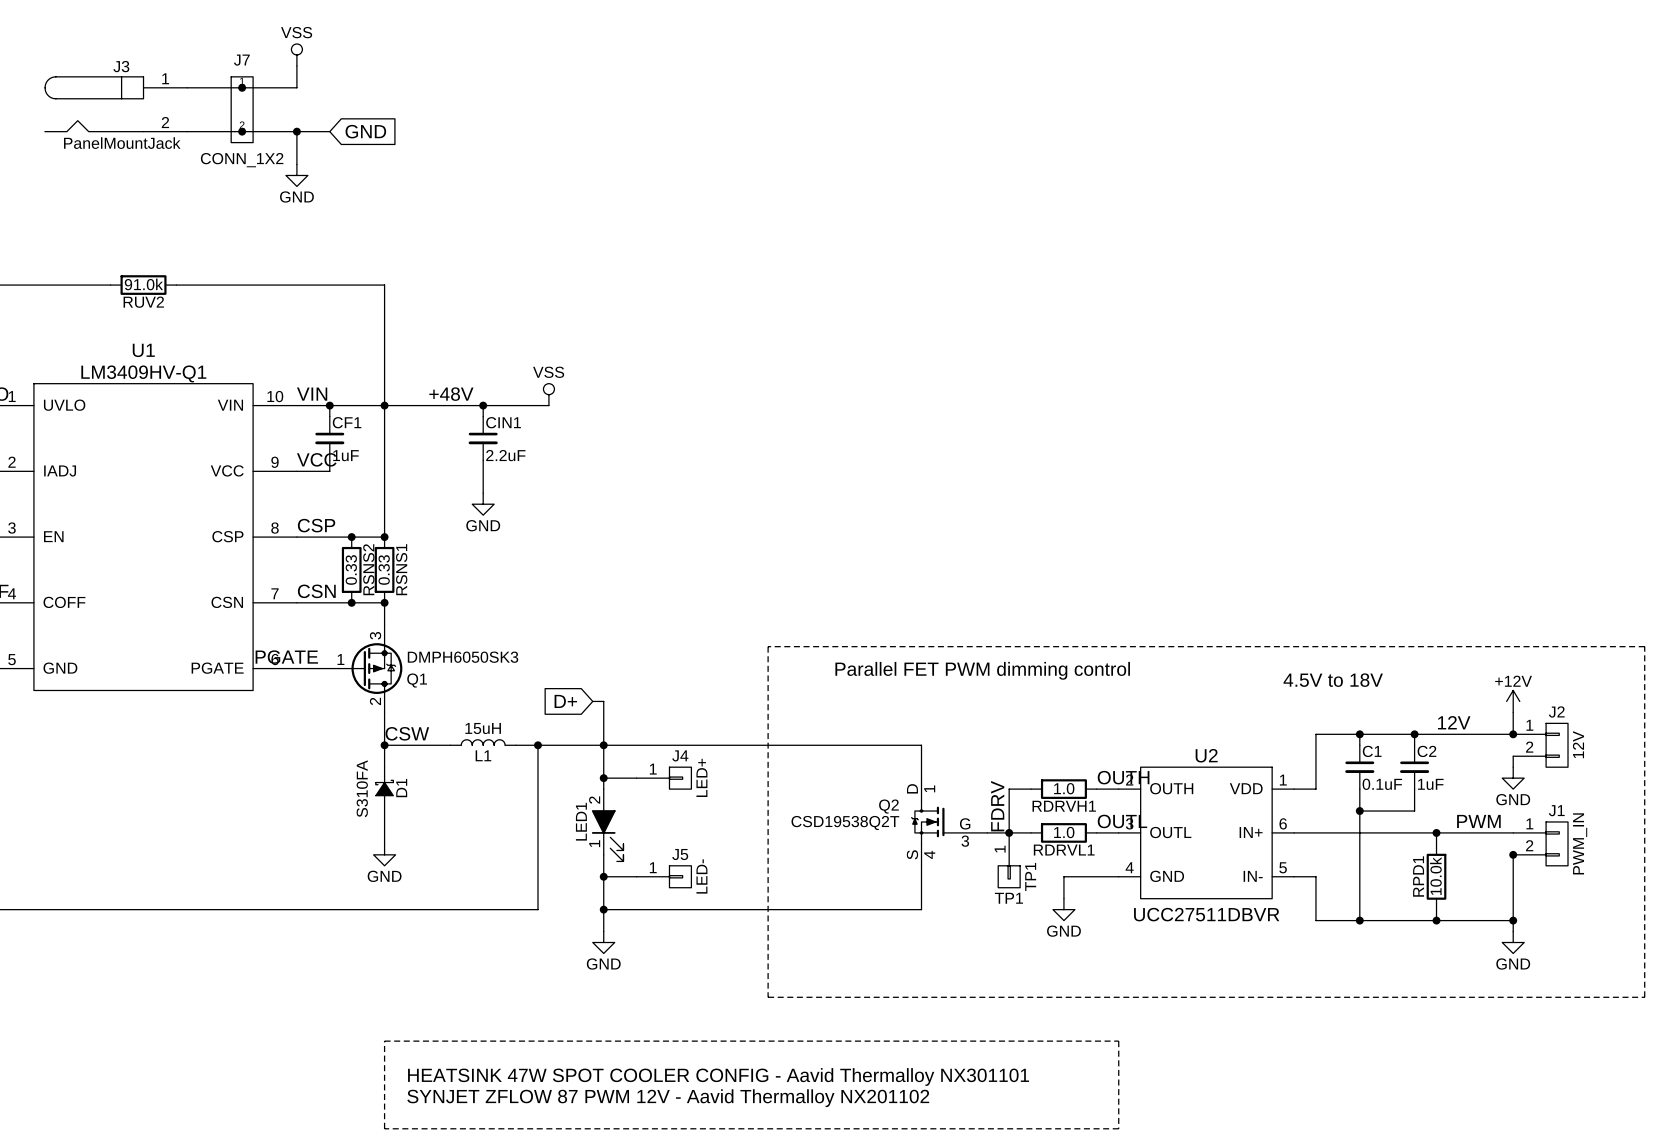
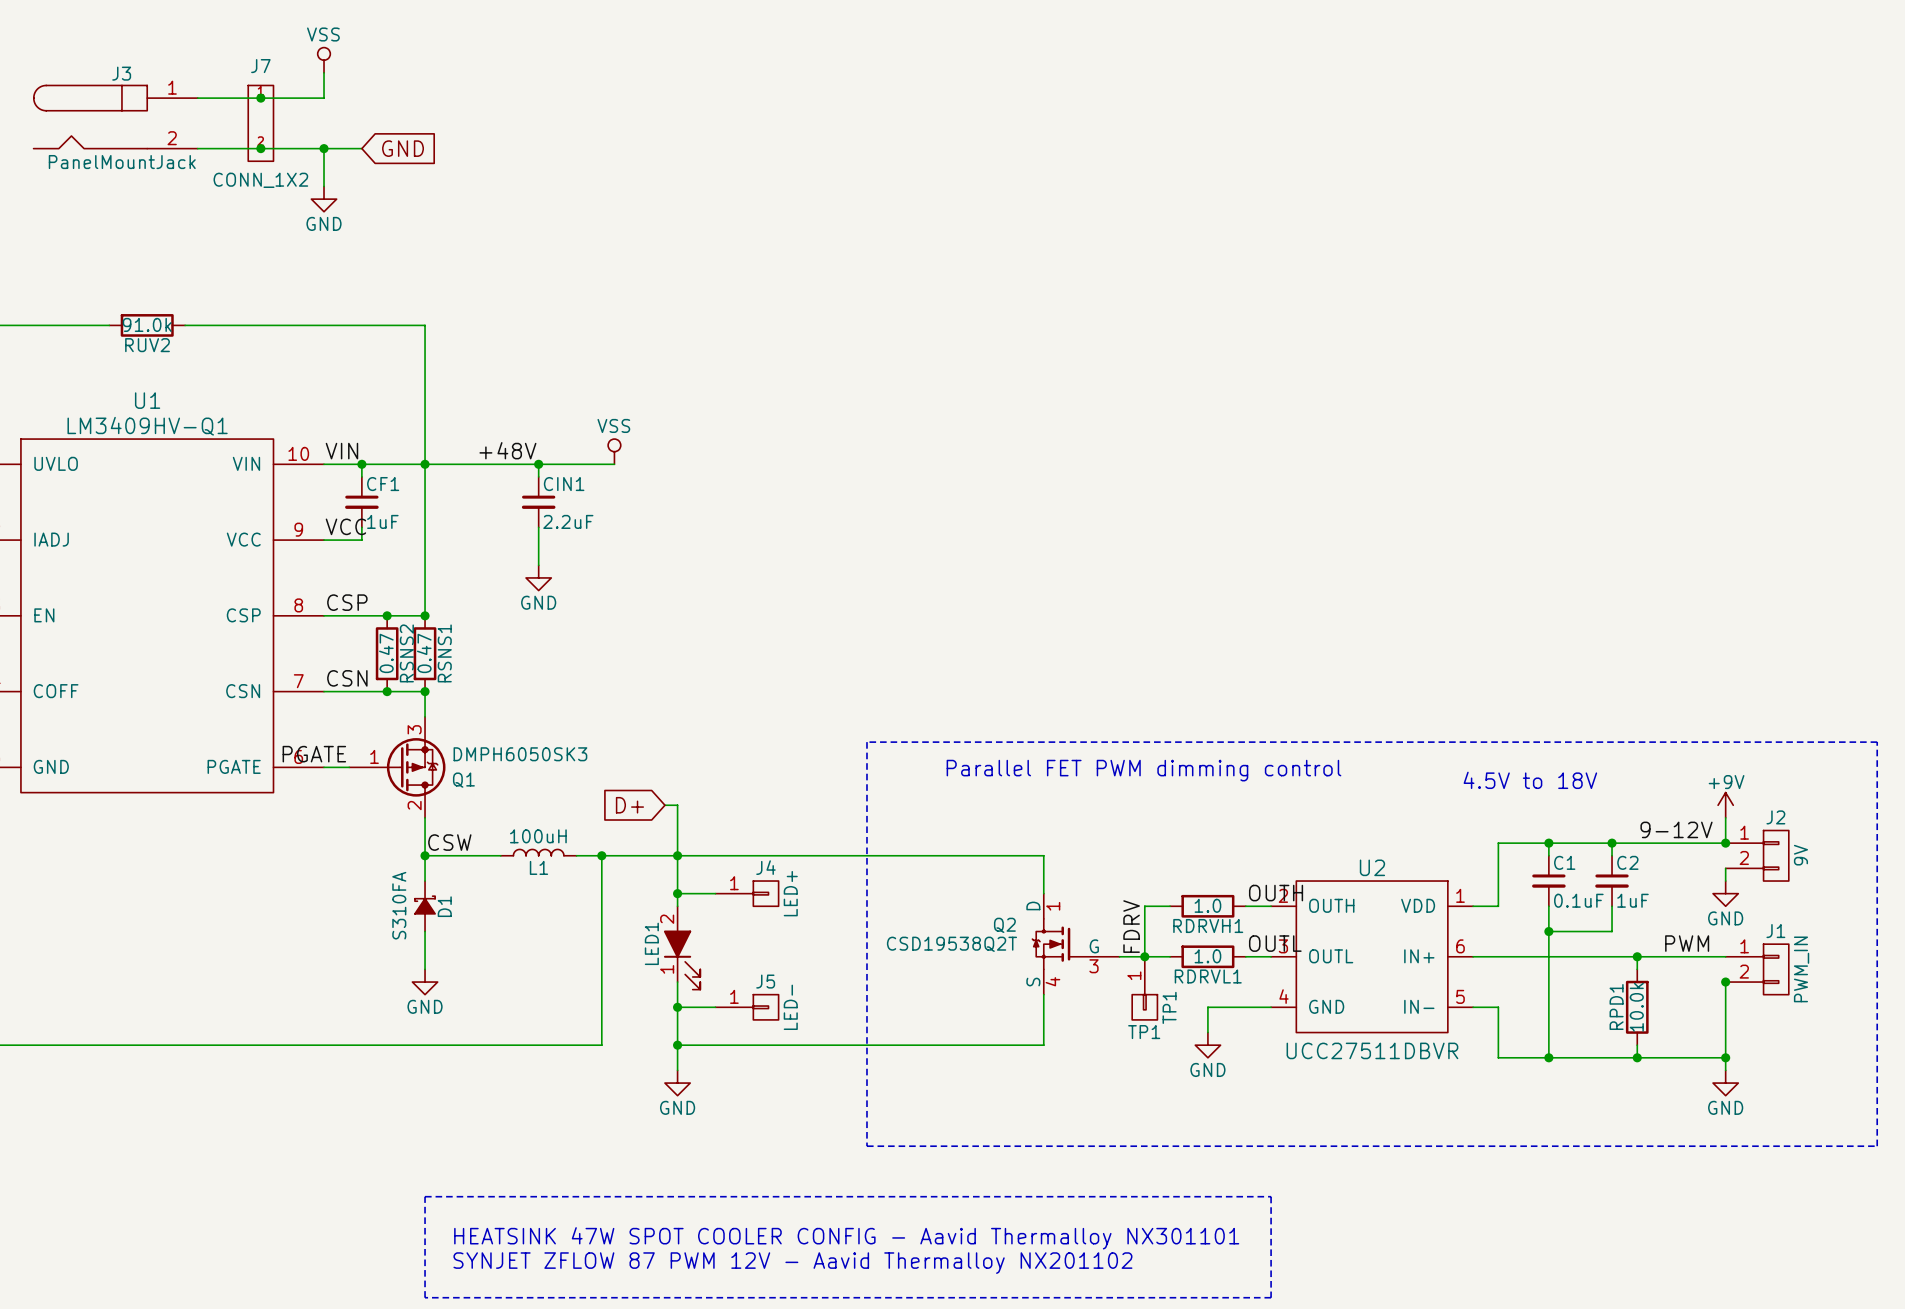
RSNS2 value: 0.33 (351, 569) -> 0.47 (386, 653)
RSNS1 value: 0.33 (384, 569) -> 0.47 (424, 653)
power symbol: +12V (1513, 701) -> +9V (1725, 805)
label: 12V (1454, 722) -> 9-12V (1676, 829)
L1 value: 15uH (483, 728) -> 100uH (538, 836)
J2 value: 12V (1578, 744) -> 9V (1800, 855)

